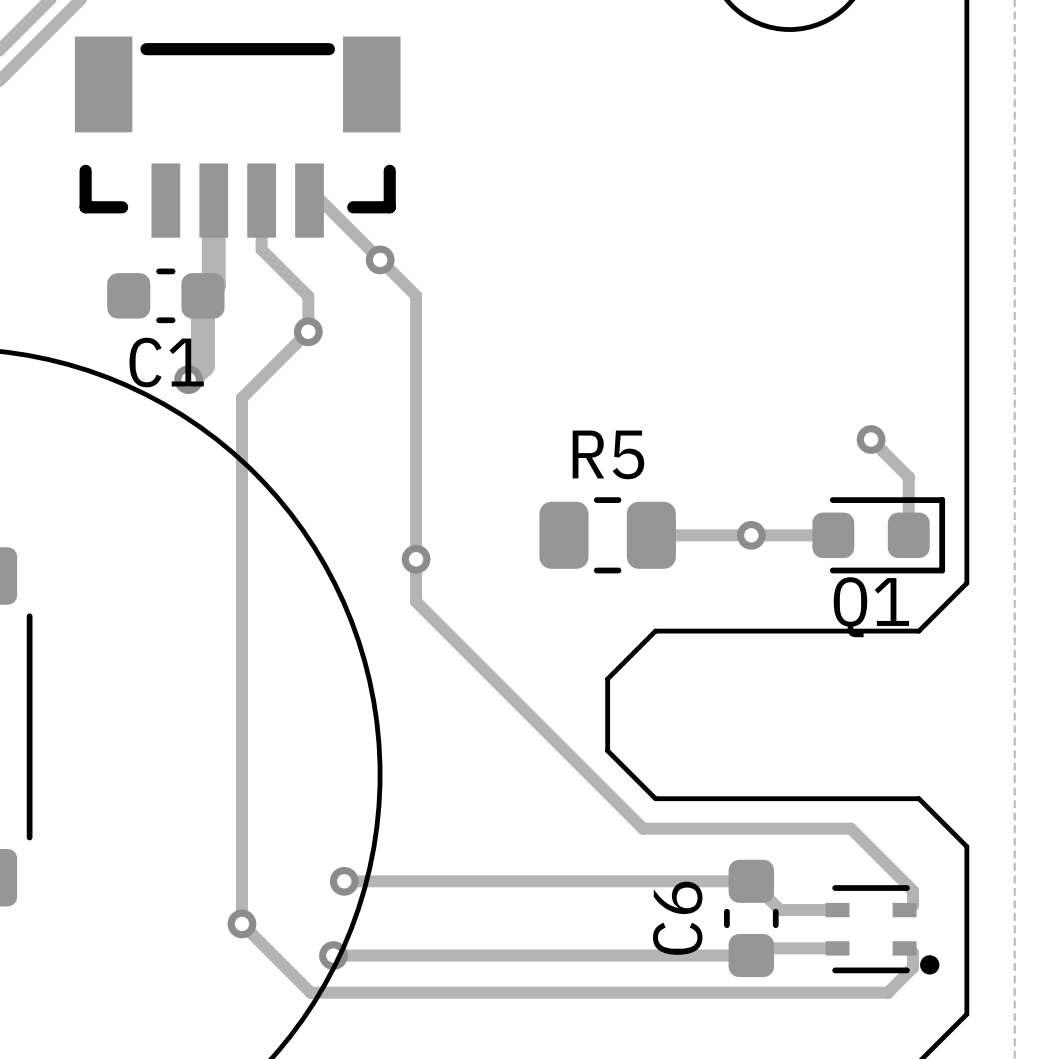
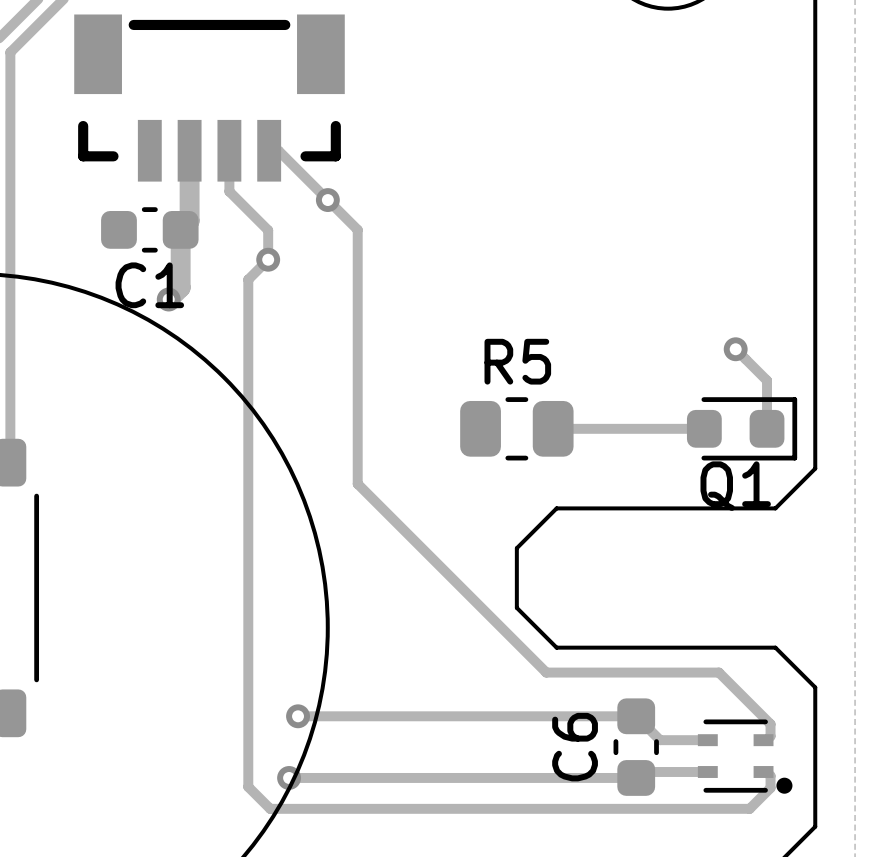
track: (284, 355) (241, 398) (241, 923) (284, 966) -> (248, 279) (248, 786)
via: (751, 535) -> none
via: (416, 559) -> none
via: (241, 923) -> none

